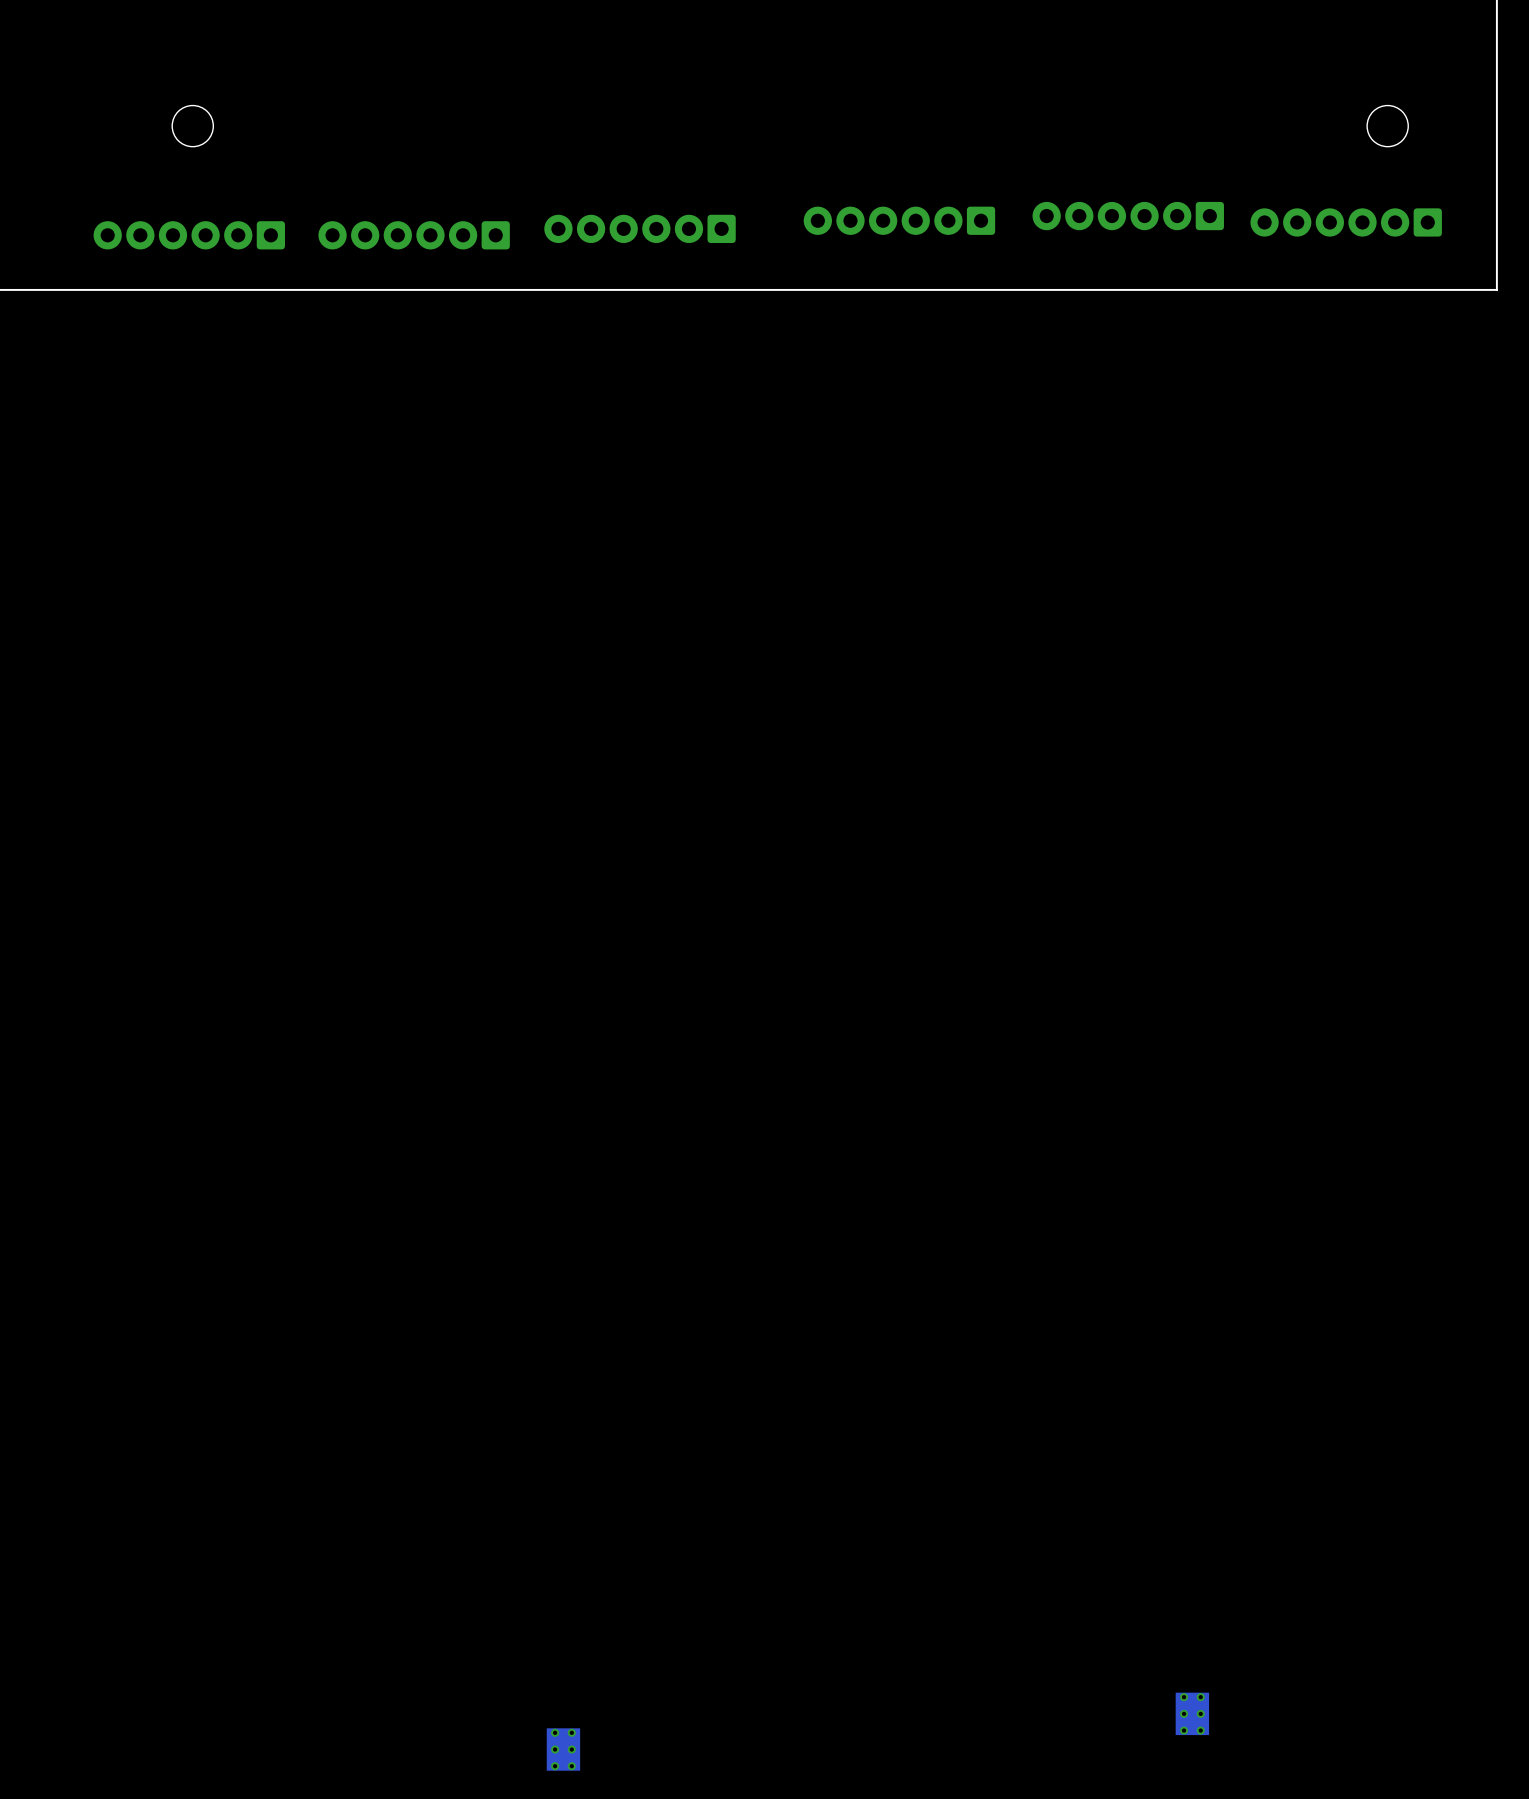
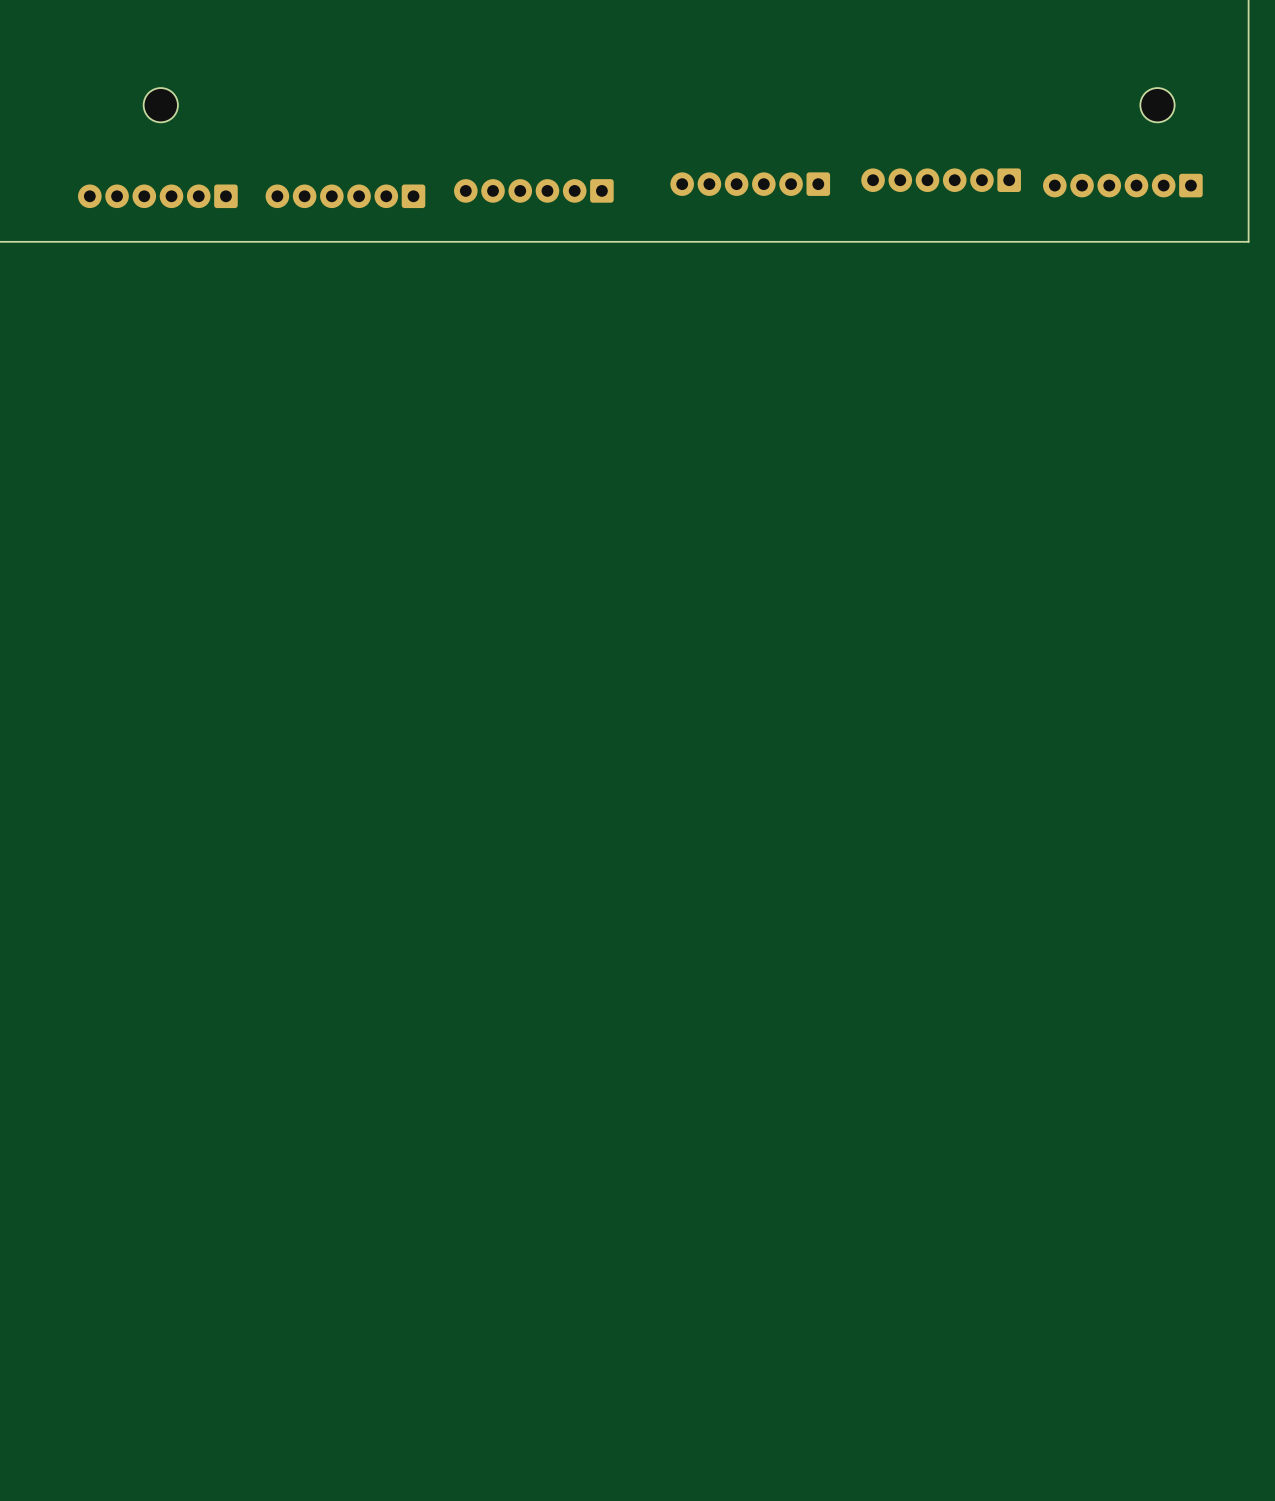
part: (1192, 1713) -> none
part: (563, 1749) -> none

